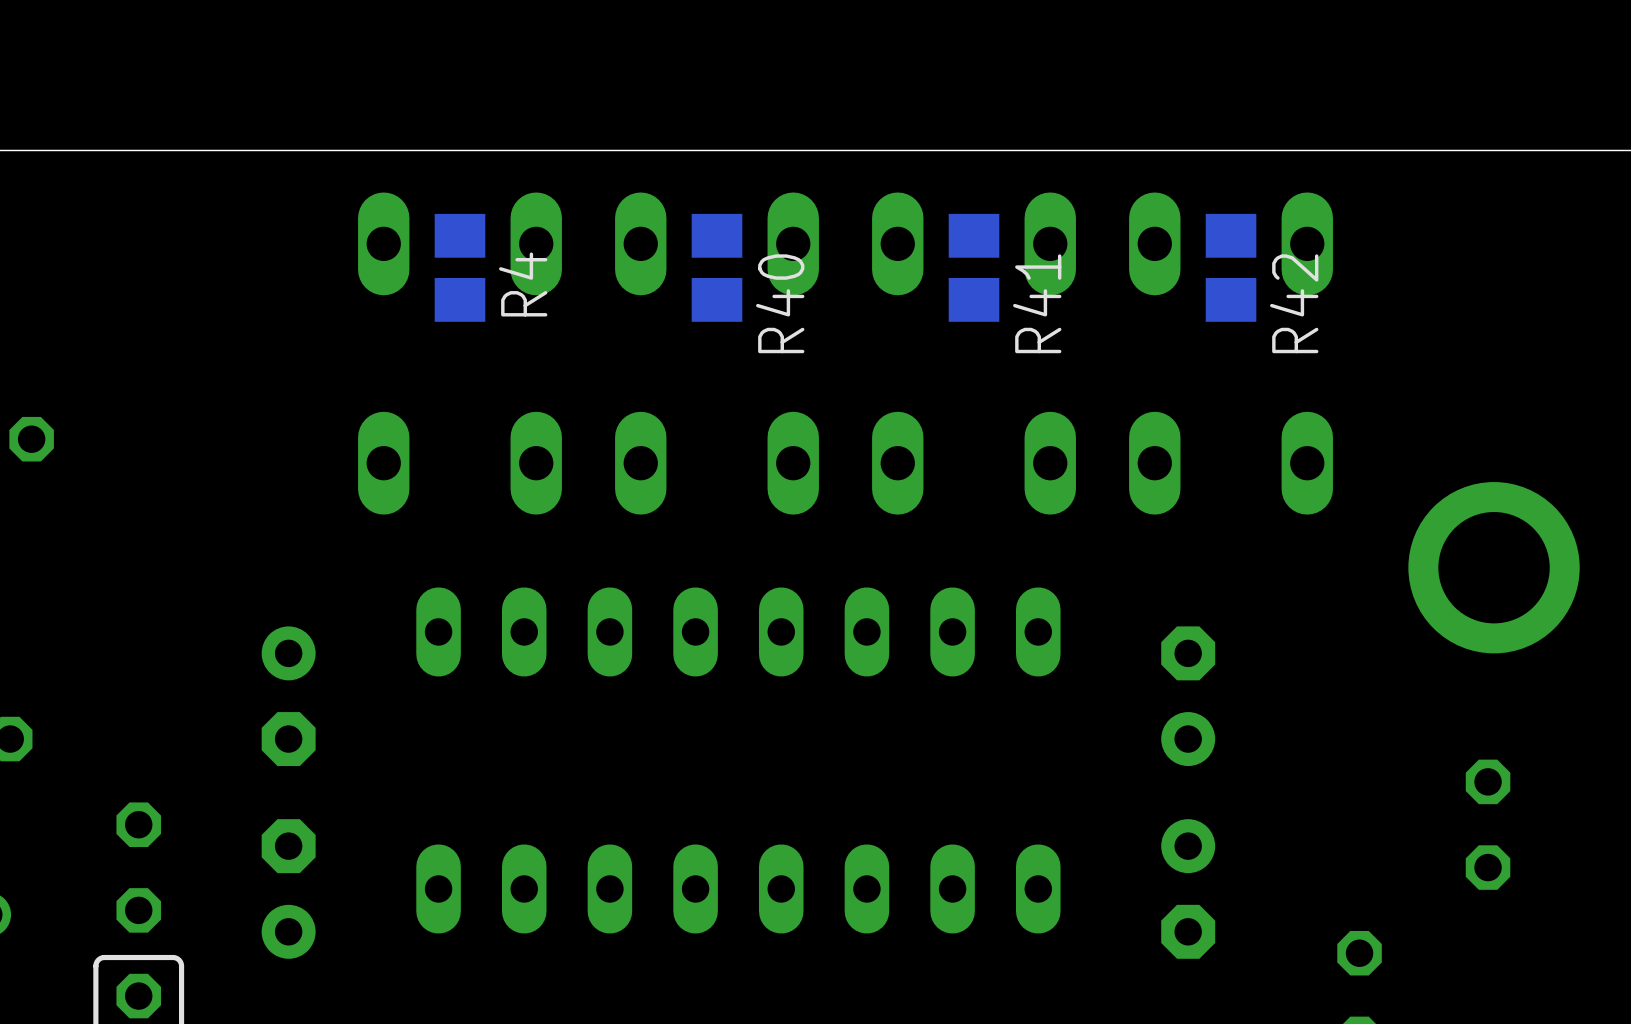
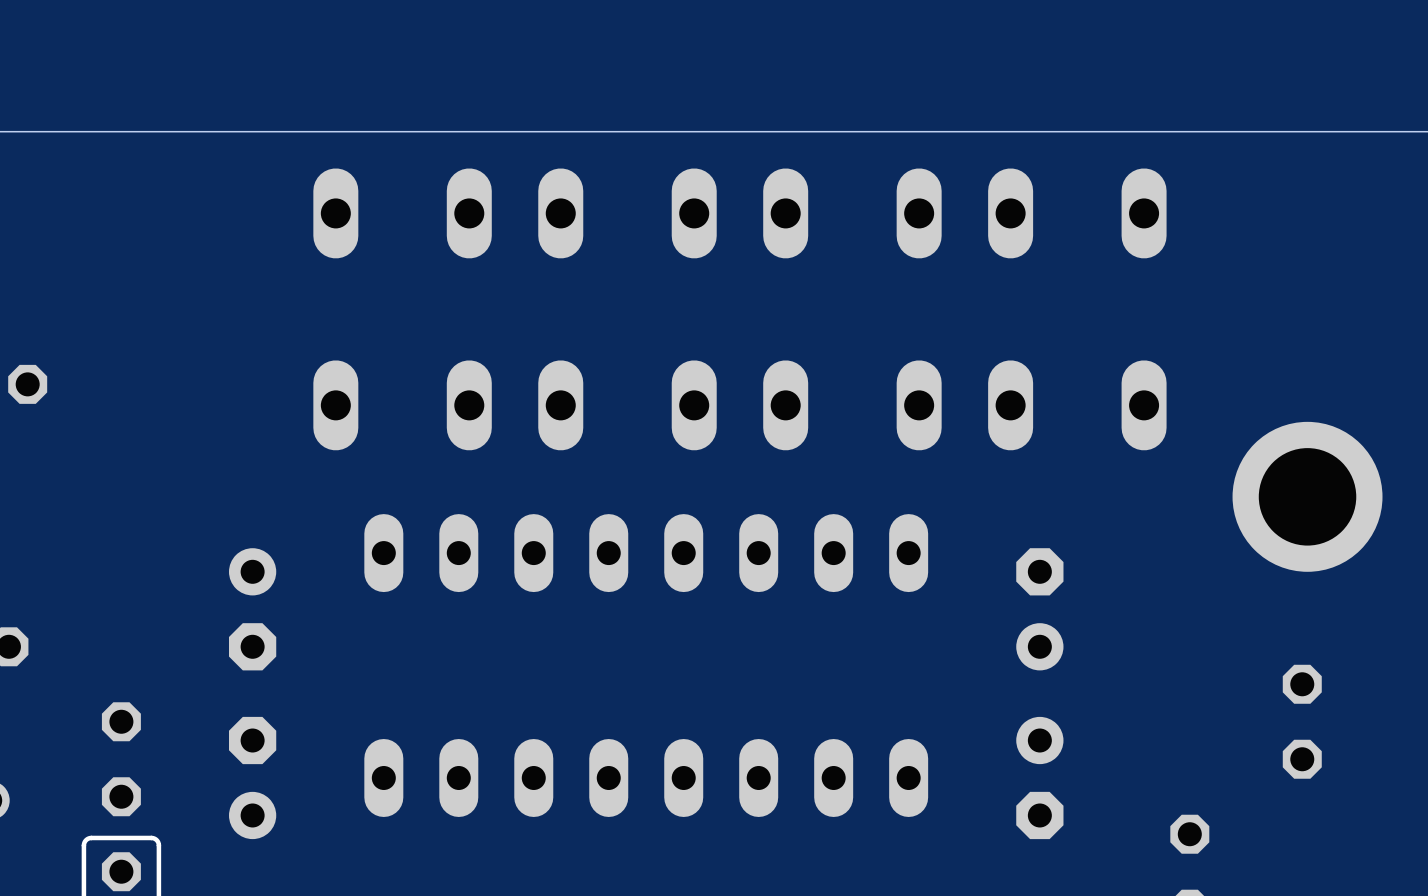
R4: (459, 267) -> none
R40: (717, 267) -> none
R41: (974, 267) -> none
R42: (1231, 267) -> none

